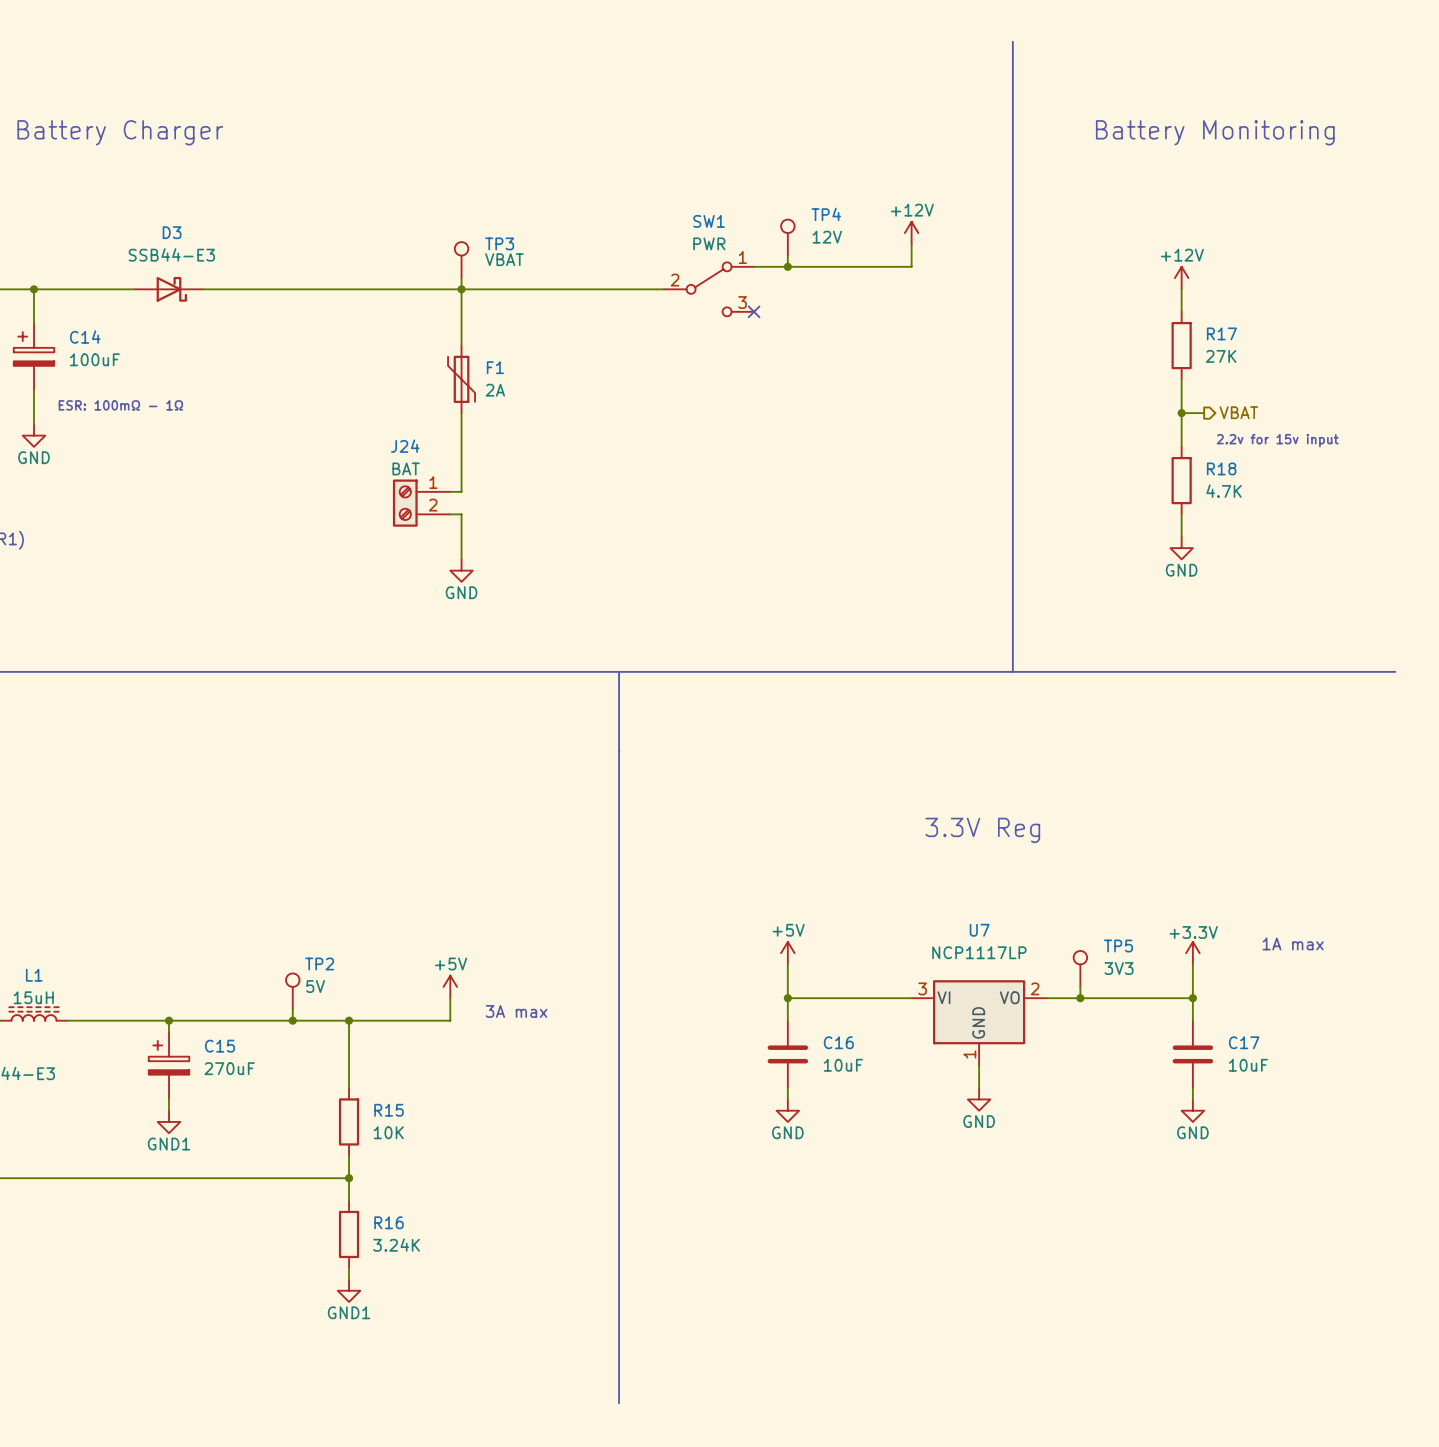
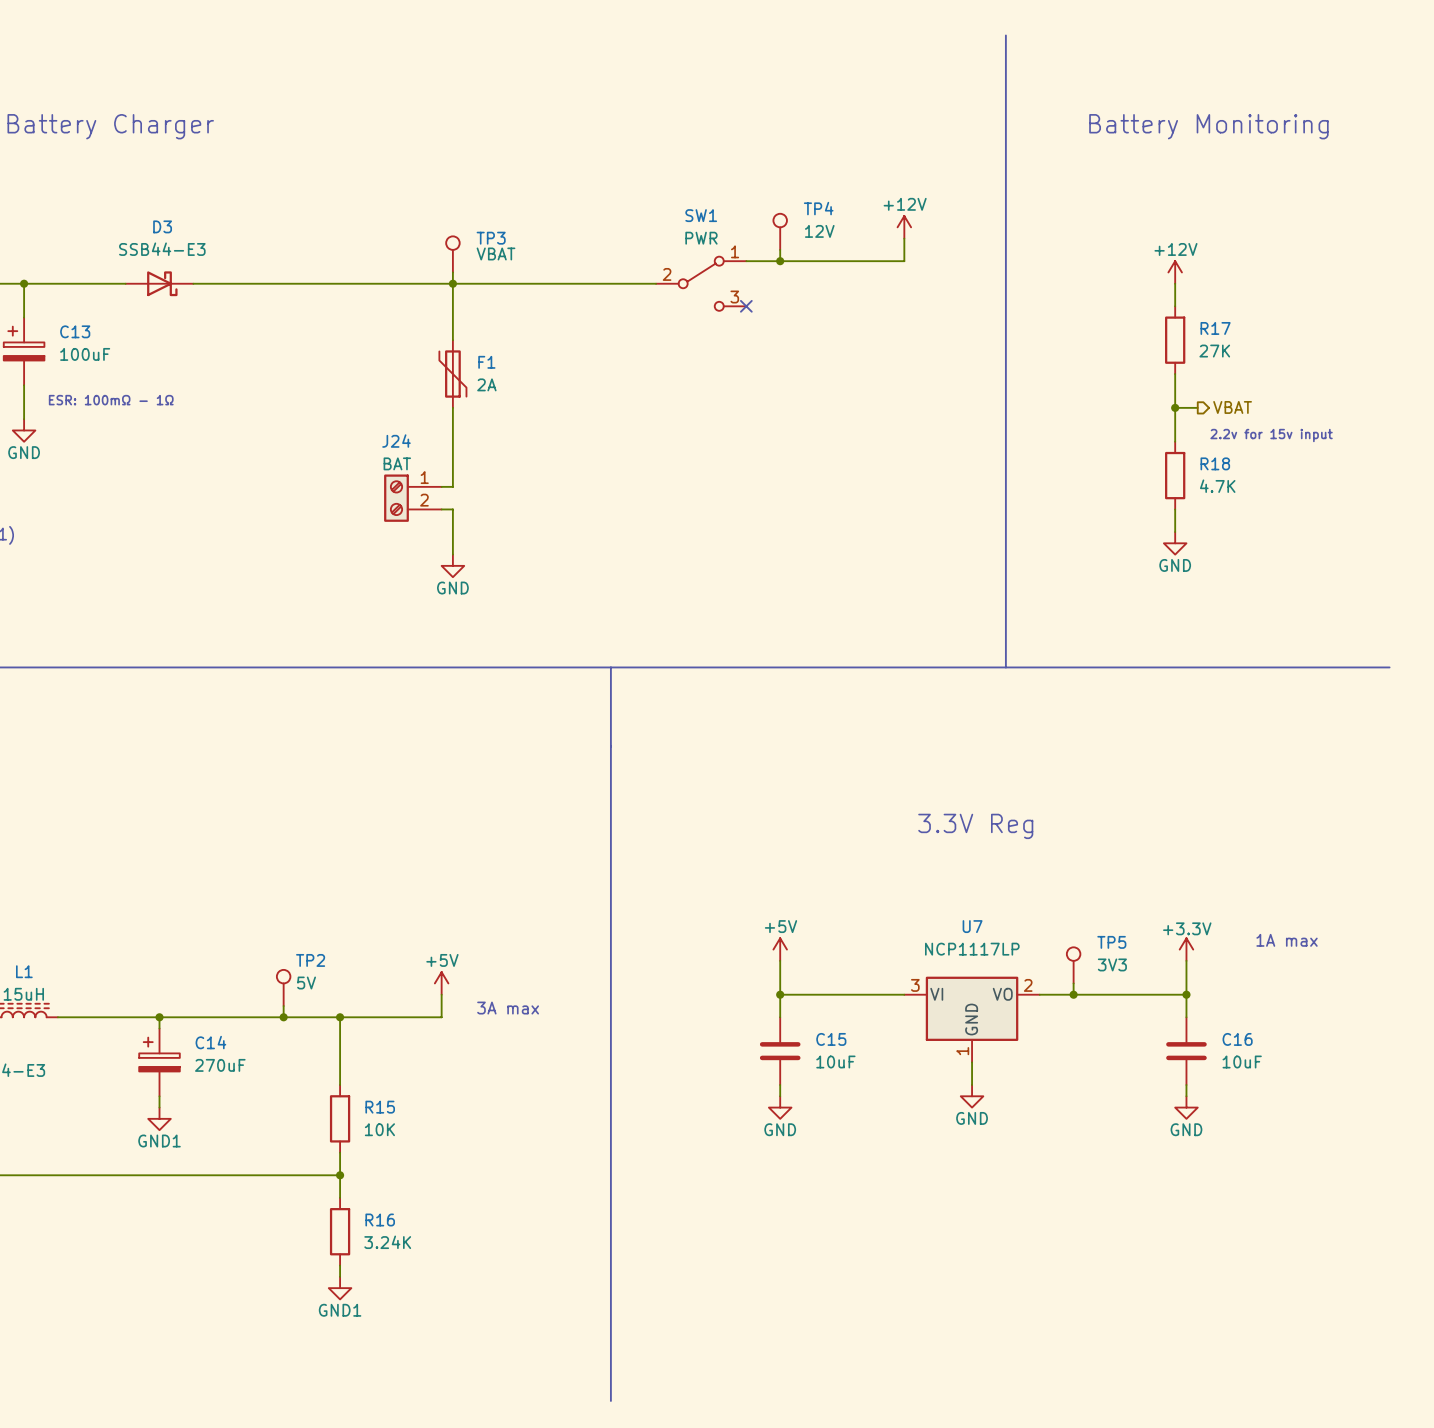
C14 name: C14 (85, 337) -> C13 (75, 331)
C16 name: C16 (838, 1042) -> C15 (831, 1039)
C17 name: C17 (1244, 1042) -> C16 (1237, 1039)
C15 name: C15 (219, 1046) -> C14 (210, 1042)

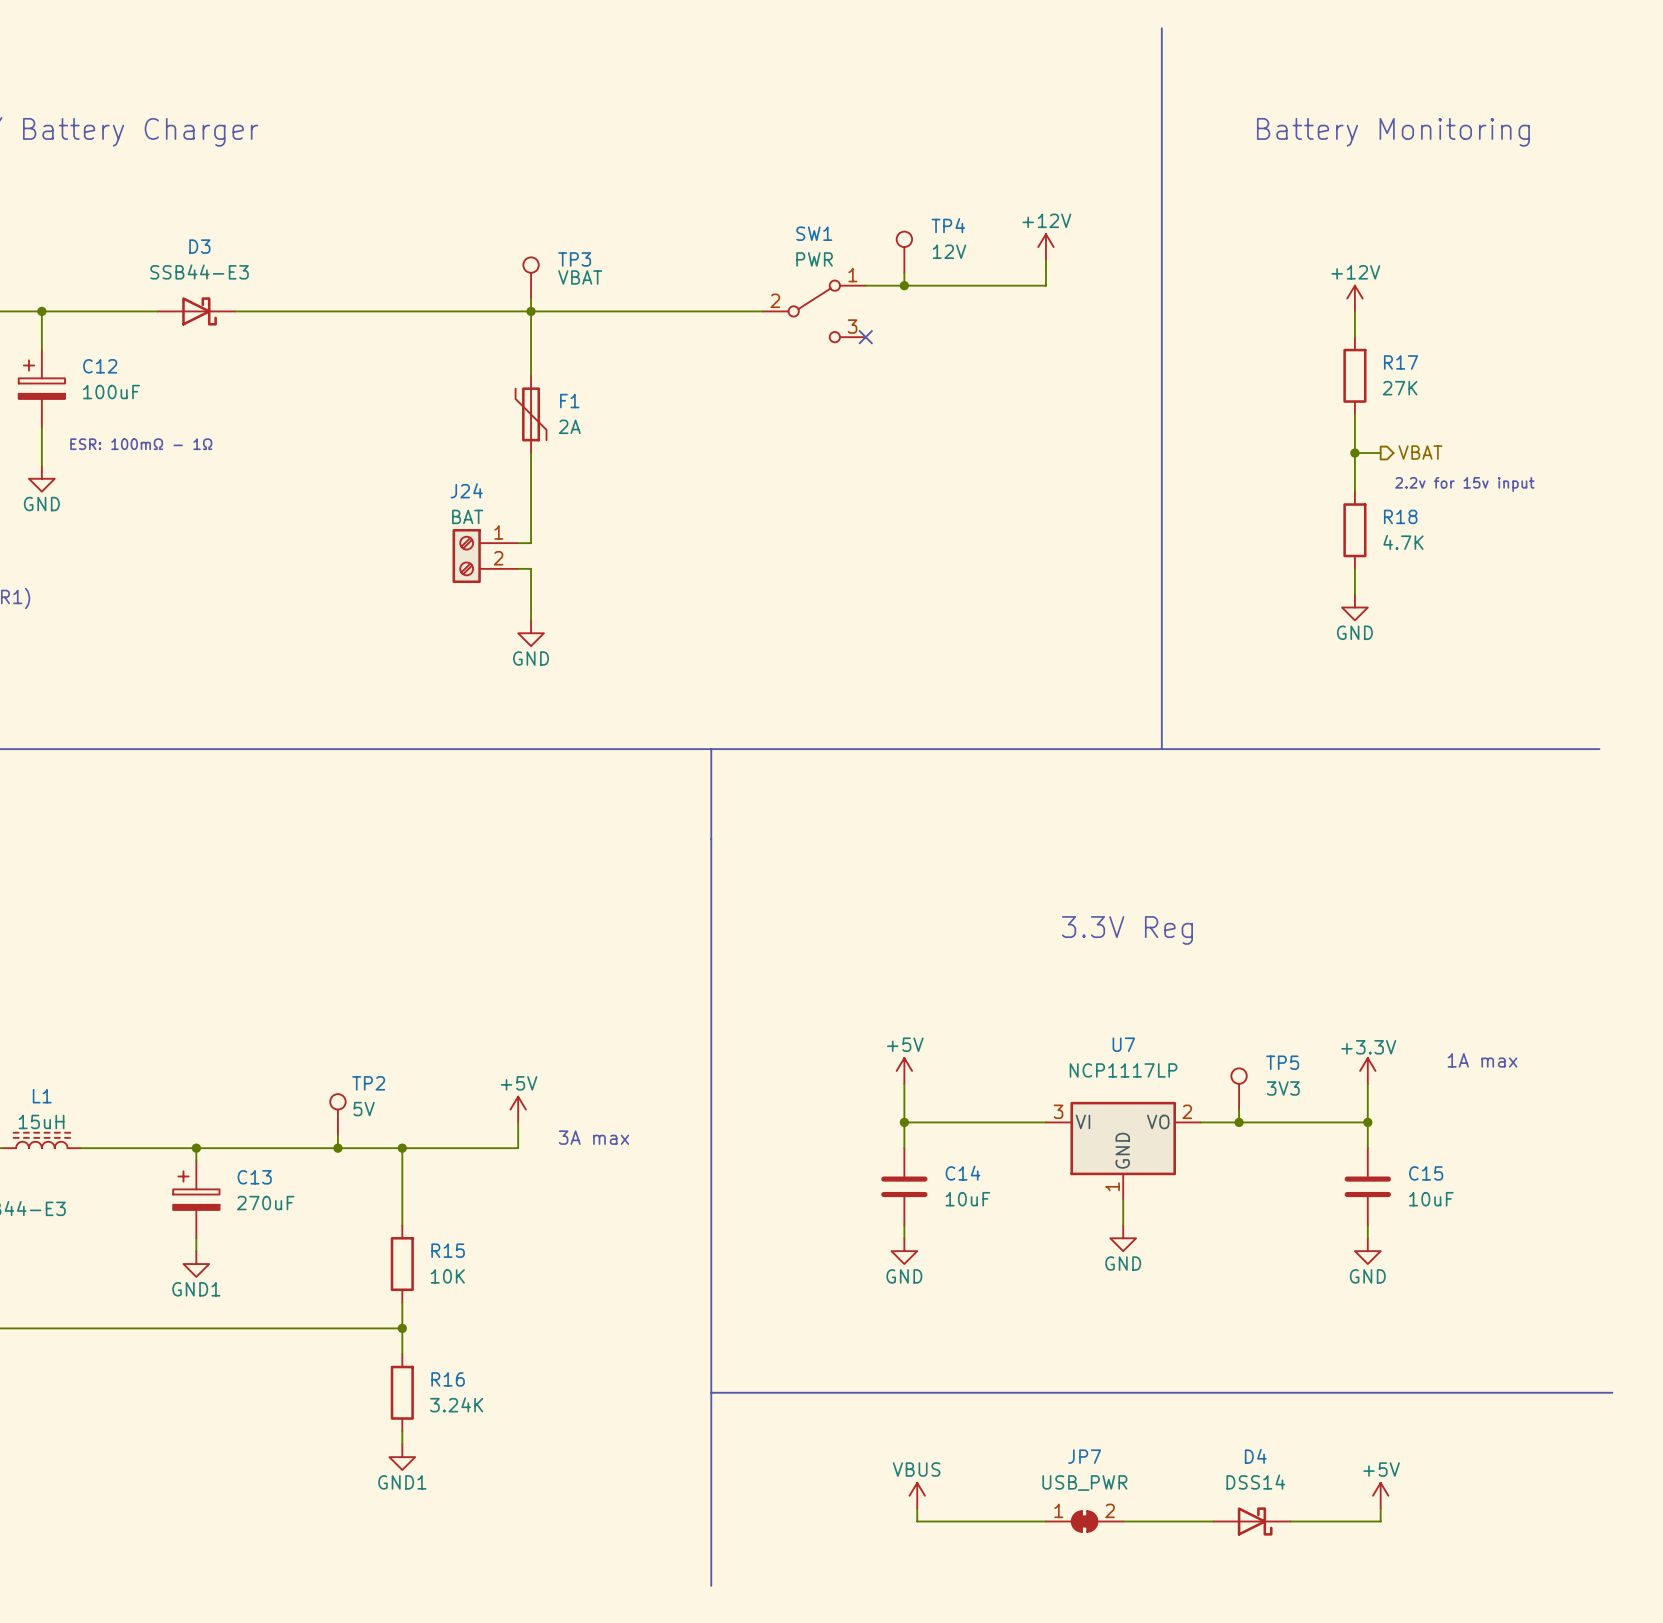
C13 name: C13 (75, 331) -> C12 (100, 366)
C15 name: C15 (831, 1039) -> C14 (963, 1173)
C16 name: C16 (1237, 1039) -> C15 (1426, 1173)
C14 name: C14 (210, 1042) -> C13 (254, 1177)
line: none -> (711, 1392) (1612, 1392)
power symbol: none -> VBUS (917, 1495)
power symbol: none -> +5V (1380, 1495)
wire: none -> (917, 1508) (917, 1521) (1045, 1521)
wire: none -> (1380, 1508) (1380, 1521) (1290, 1521)
JP7: none -> USB_PWR (1084, 1521)
wire: none -> (1123, 1521) (1213, 1521)
D4: none -> DSS14 (1251, 1521)

